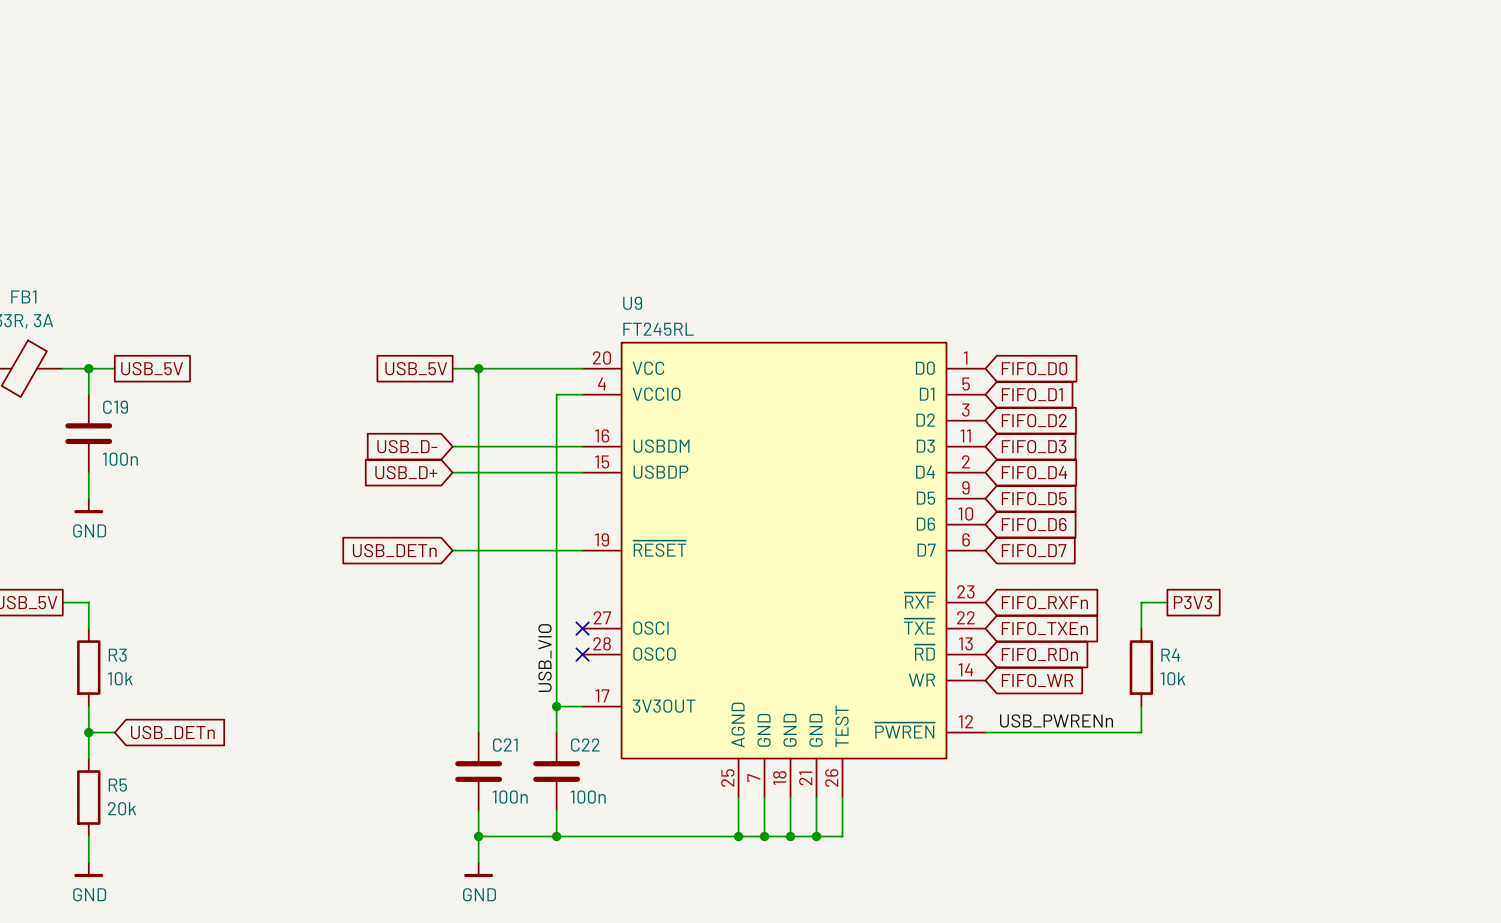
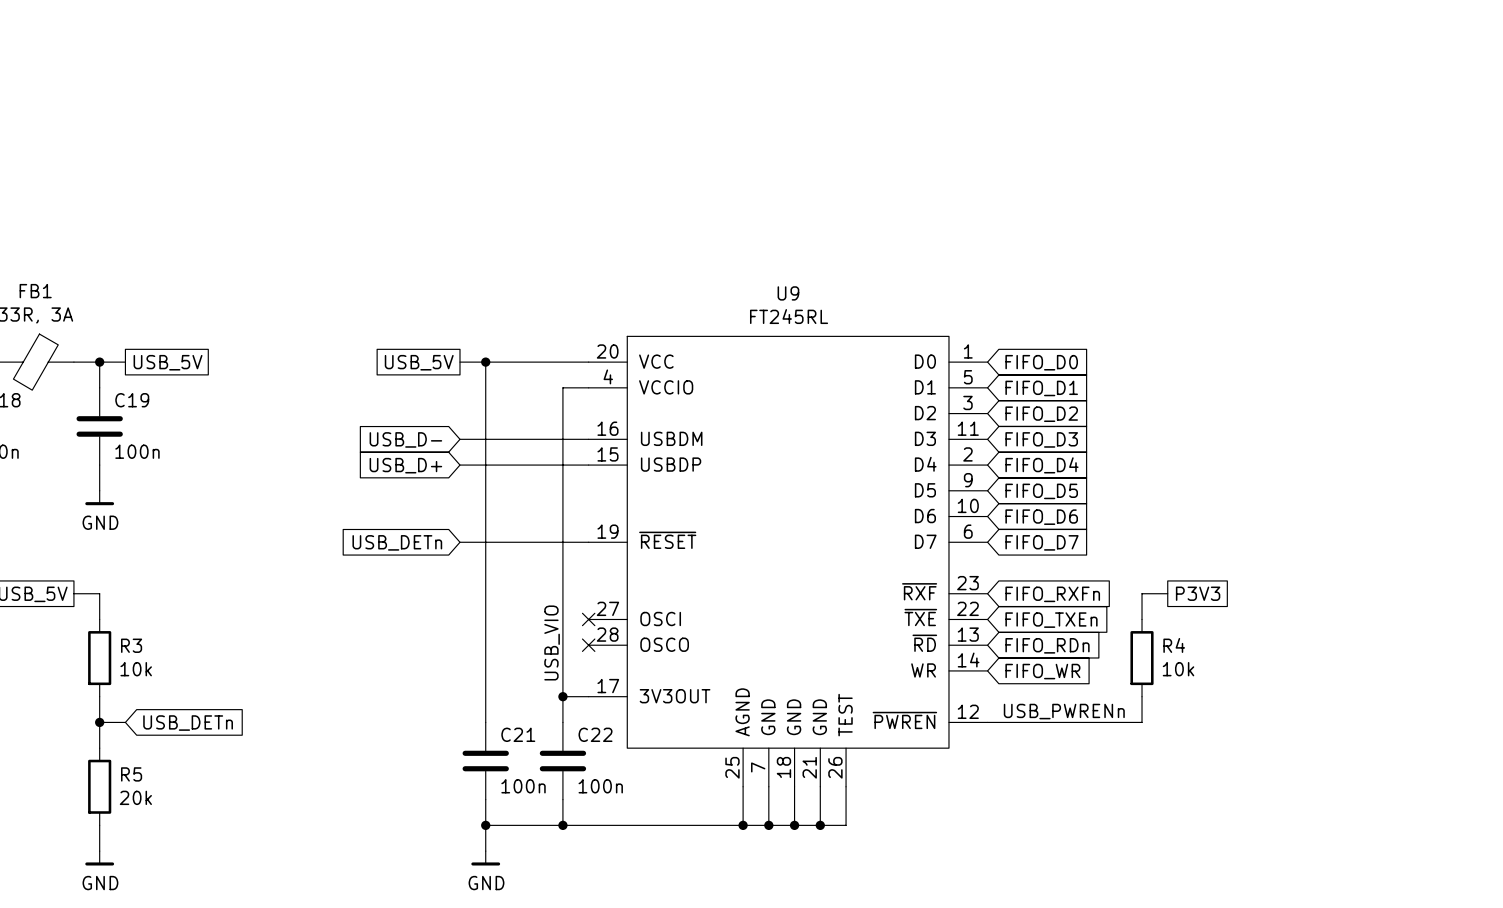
U9 name position: U9 (632, 303) -> U9 (788, 293)
U9 value position: FT245RL (658, 329) -> FT245RL (789, 316)

